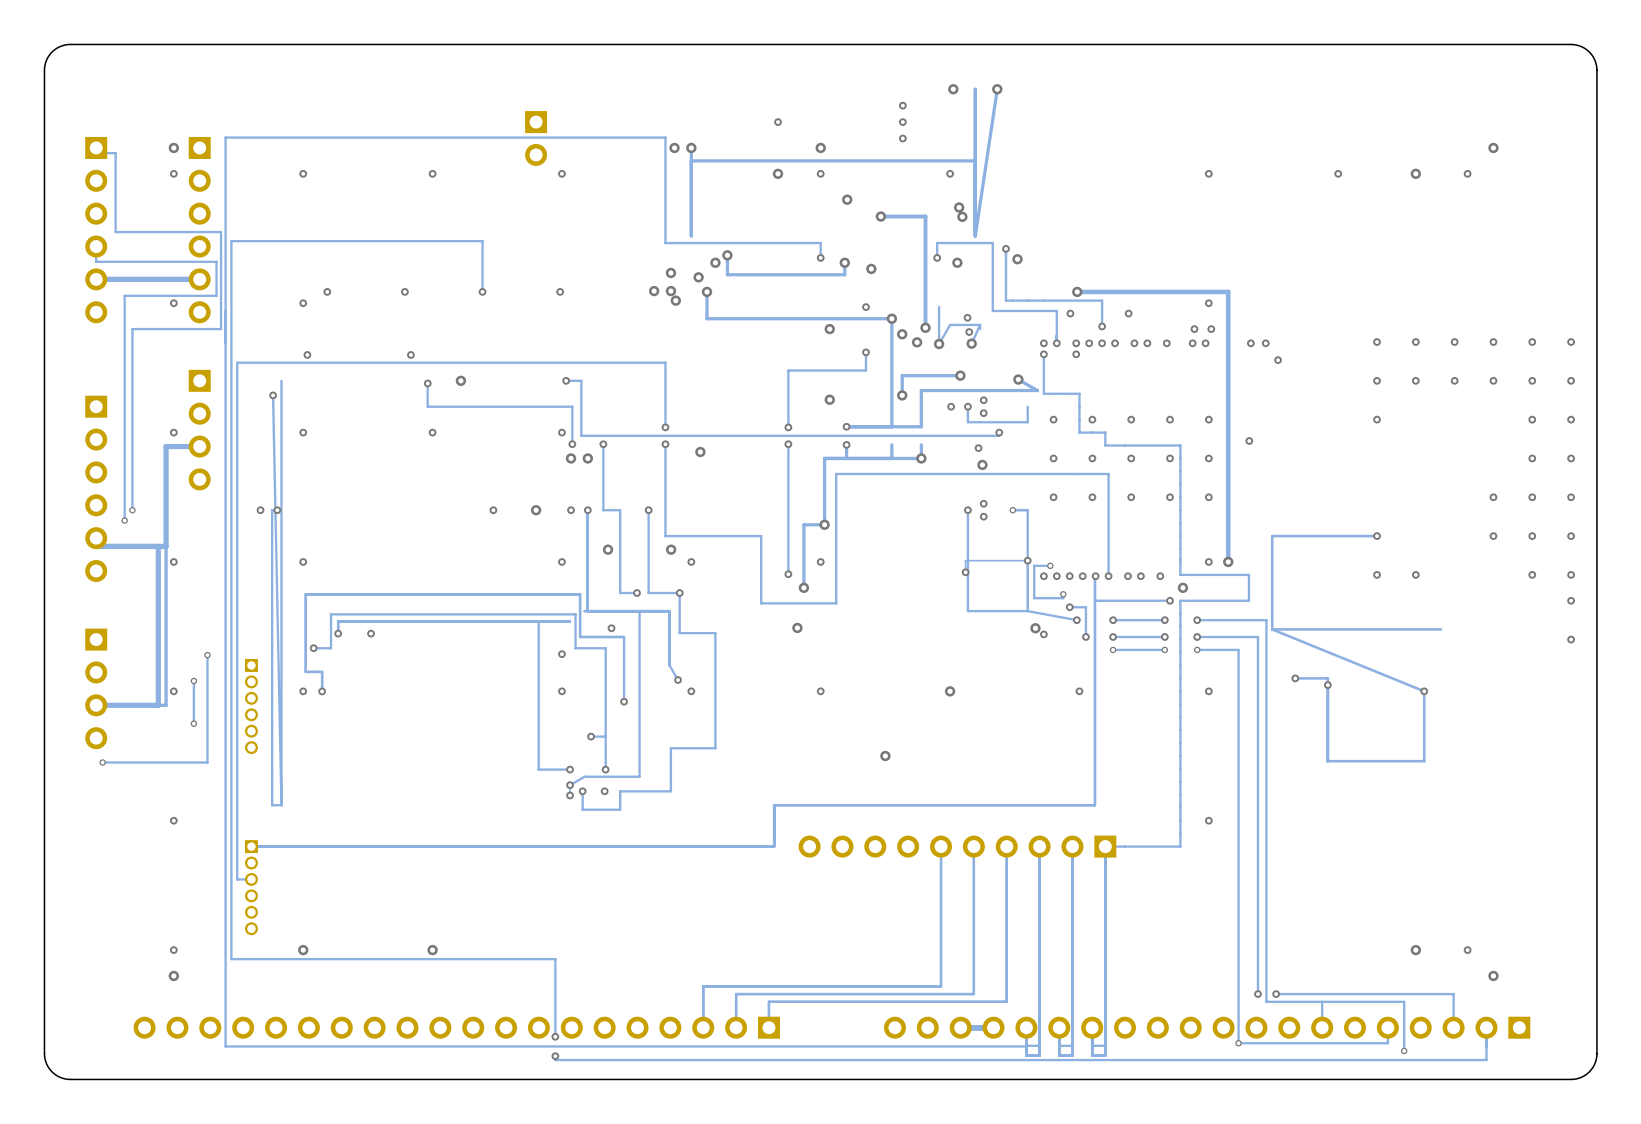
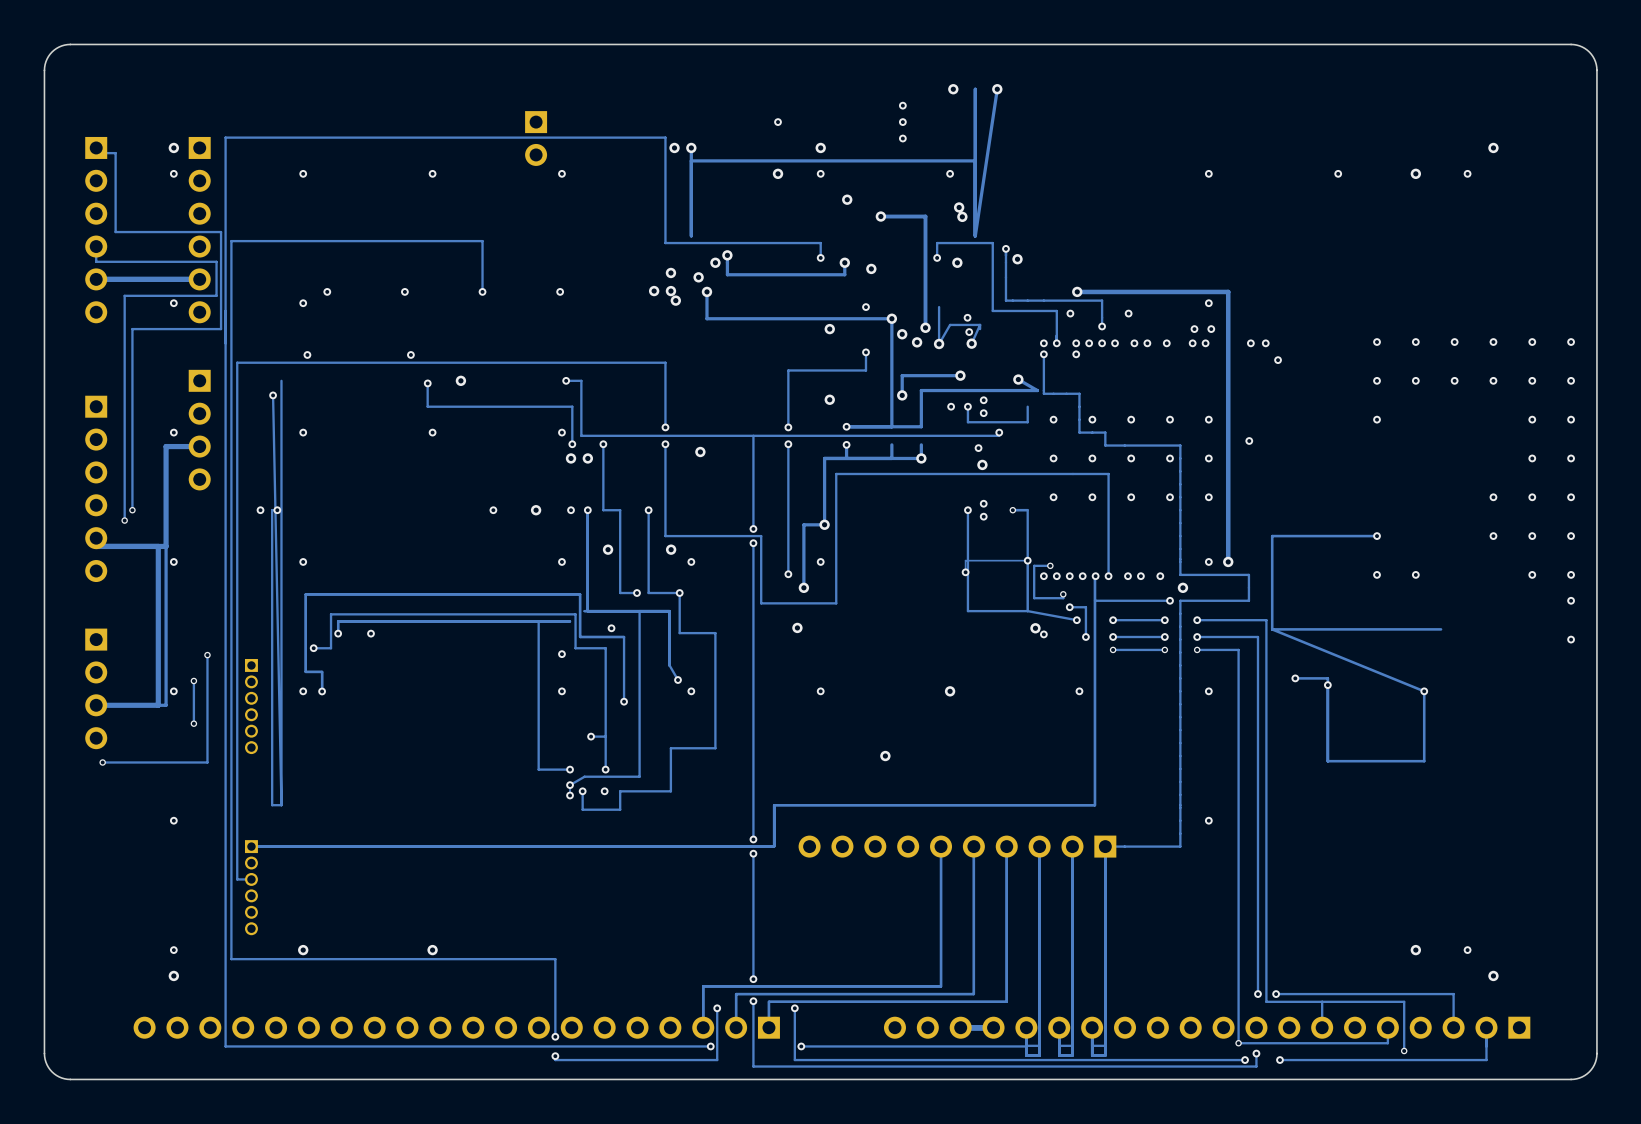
track: none -> (753, 435) (753, 528)
via: none -> (753, 528)
track: none -> (753, 543) (753, 839)
via: none -> (753, 543)
via: none -> (753, 839)
track: none -> (753, 853) (753, 979)
via: none -> (753, 853)
via: none -> (753, 979)
track: none -> (753, 1001) (753, 1066) (1256, 1066) (1256, 1053)
via: none -> (753, 1001)
track: none -> (717, 1008) (717, 1060)
via: none -> (717, 1008)
via: none -> (794, 1008)
via: none -> (710, 1046)
track: (801, 1046) (710, 1046) -> none
via: none -> (801, 1046)
via: none -> (1256, 1053)
track: (794, 1060) (717, 1060) -> (794, 1060) (794, 1008)
via: none -> (1245, 1060)
track: (1279, 1060) (1245, 1060) -> none
via: none -> (1279, 1060)

